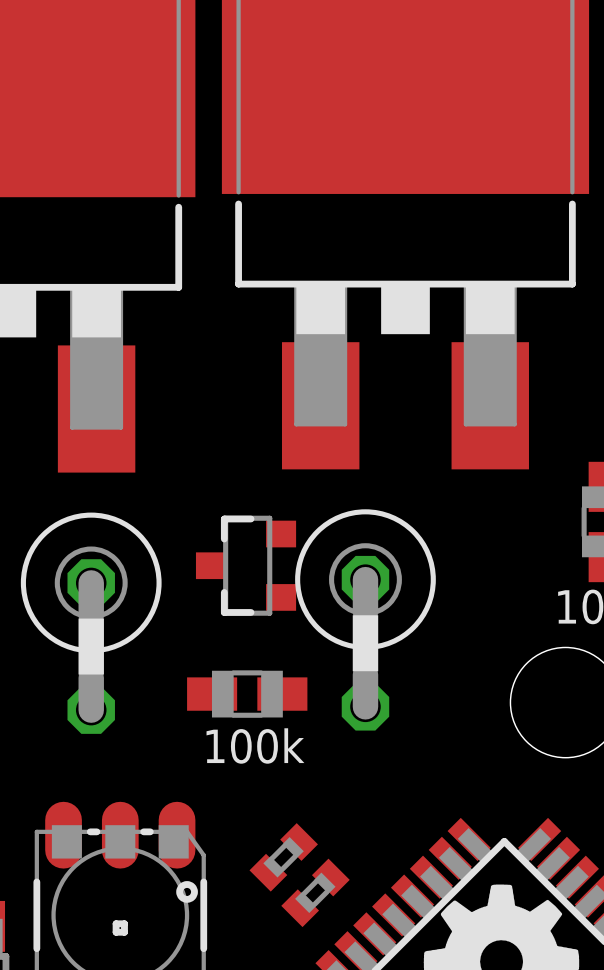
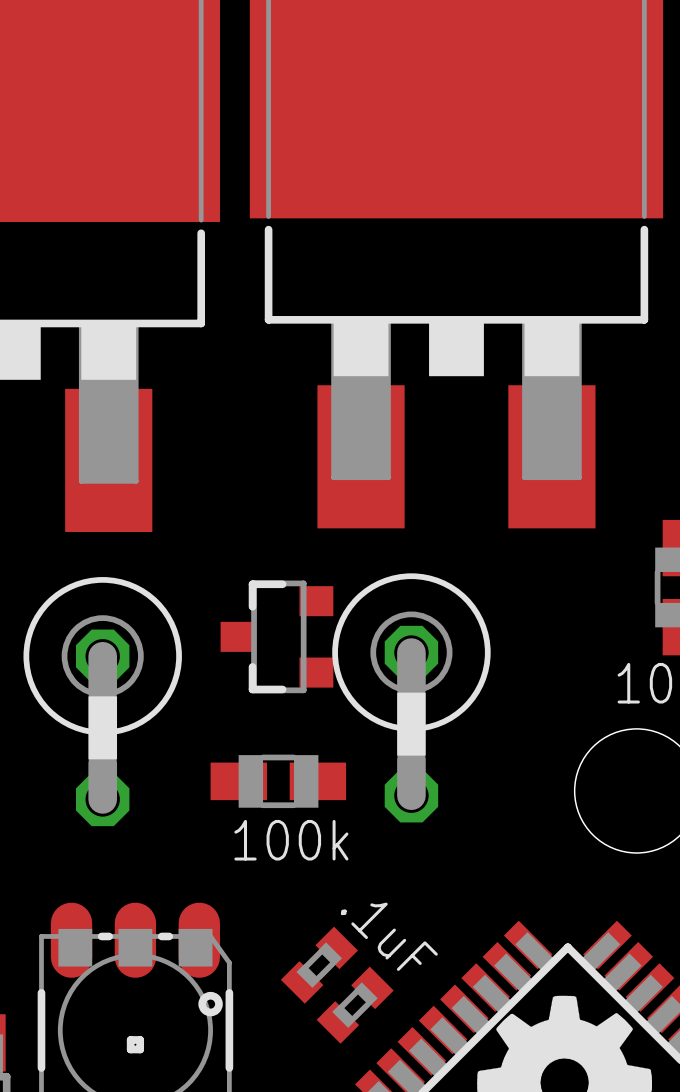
text: none -> .1uF (389, 936)

